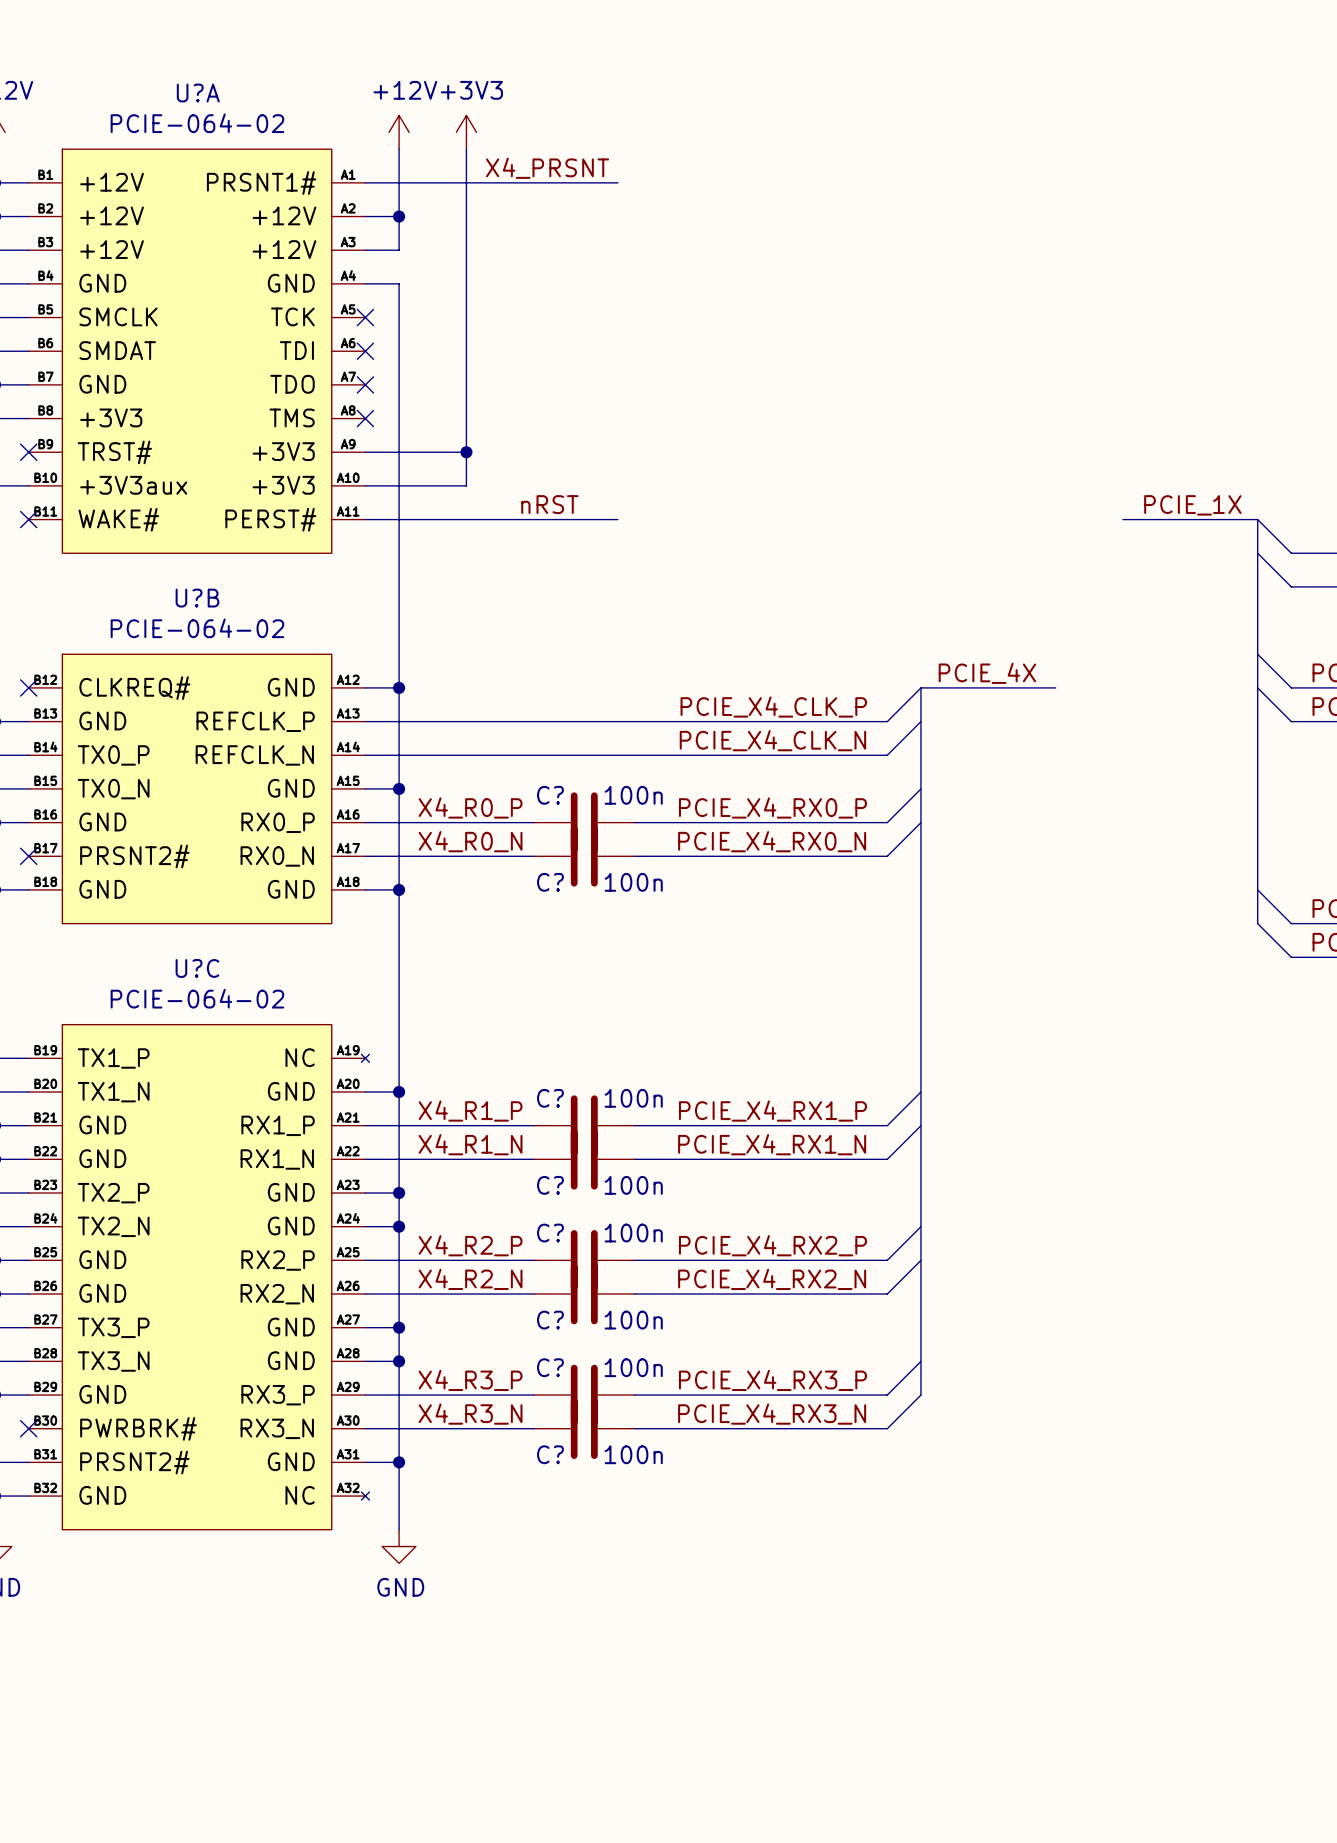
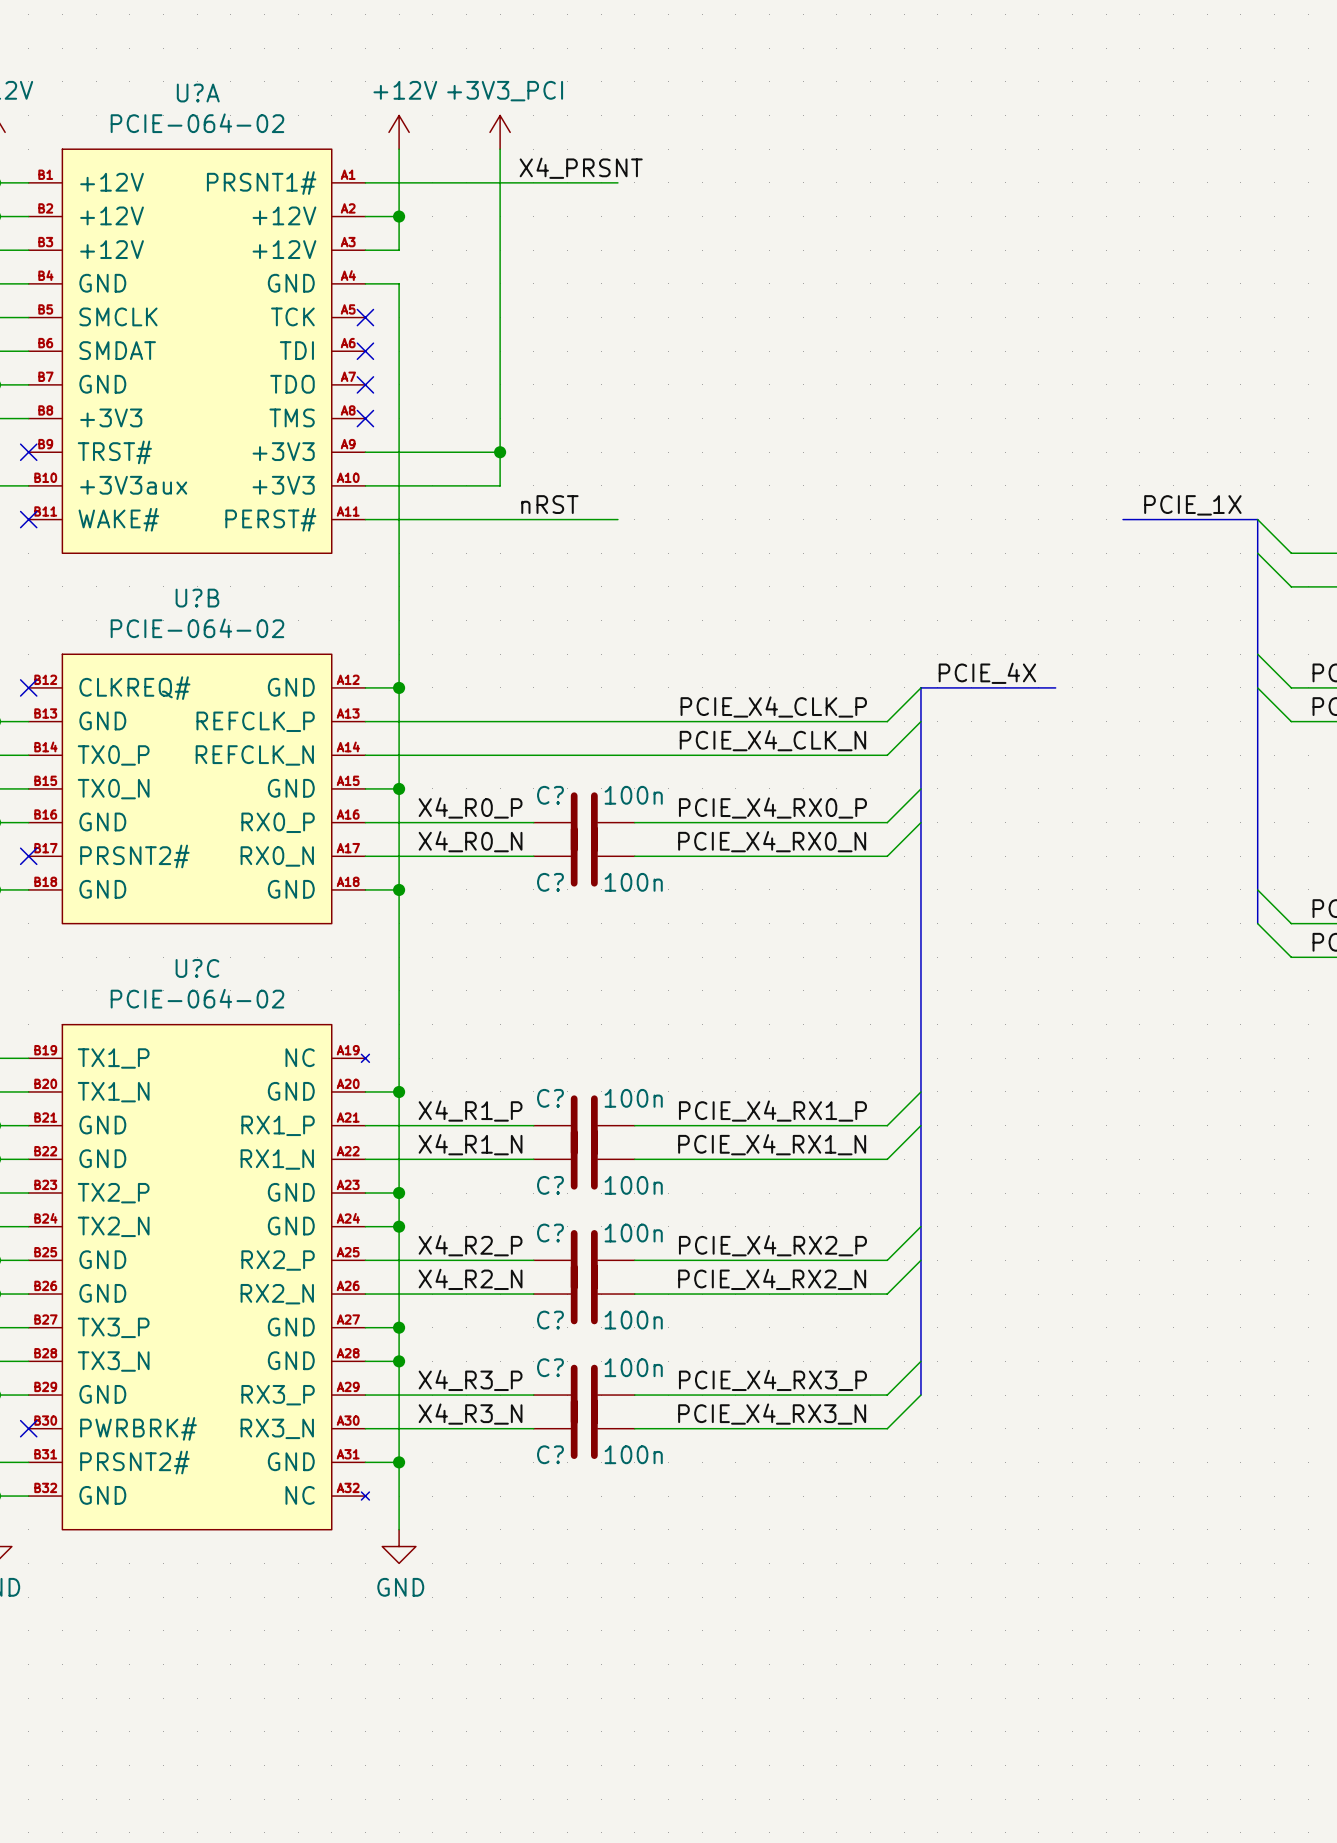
power symbol: +3V3 (466, 132) -> none
power symbol: none -> +3V3_PCI (500, 132)
wire: (466, 149) (466, 485) -> (500, 149) (500, 485) (466, 485)
label position: X4_PRSNT (547, 168) -> X4_PRSNT (581, 168)
wire: none -> (466, 452) (500, 452)
junction position: (466, 452) -> (500, 452)

